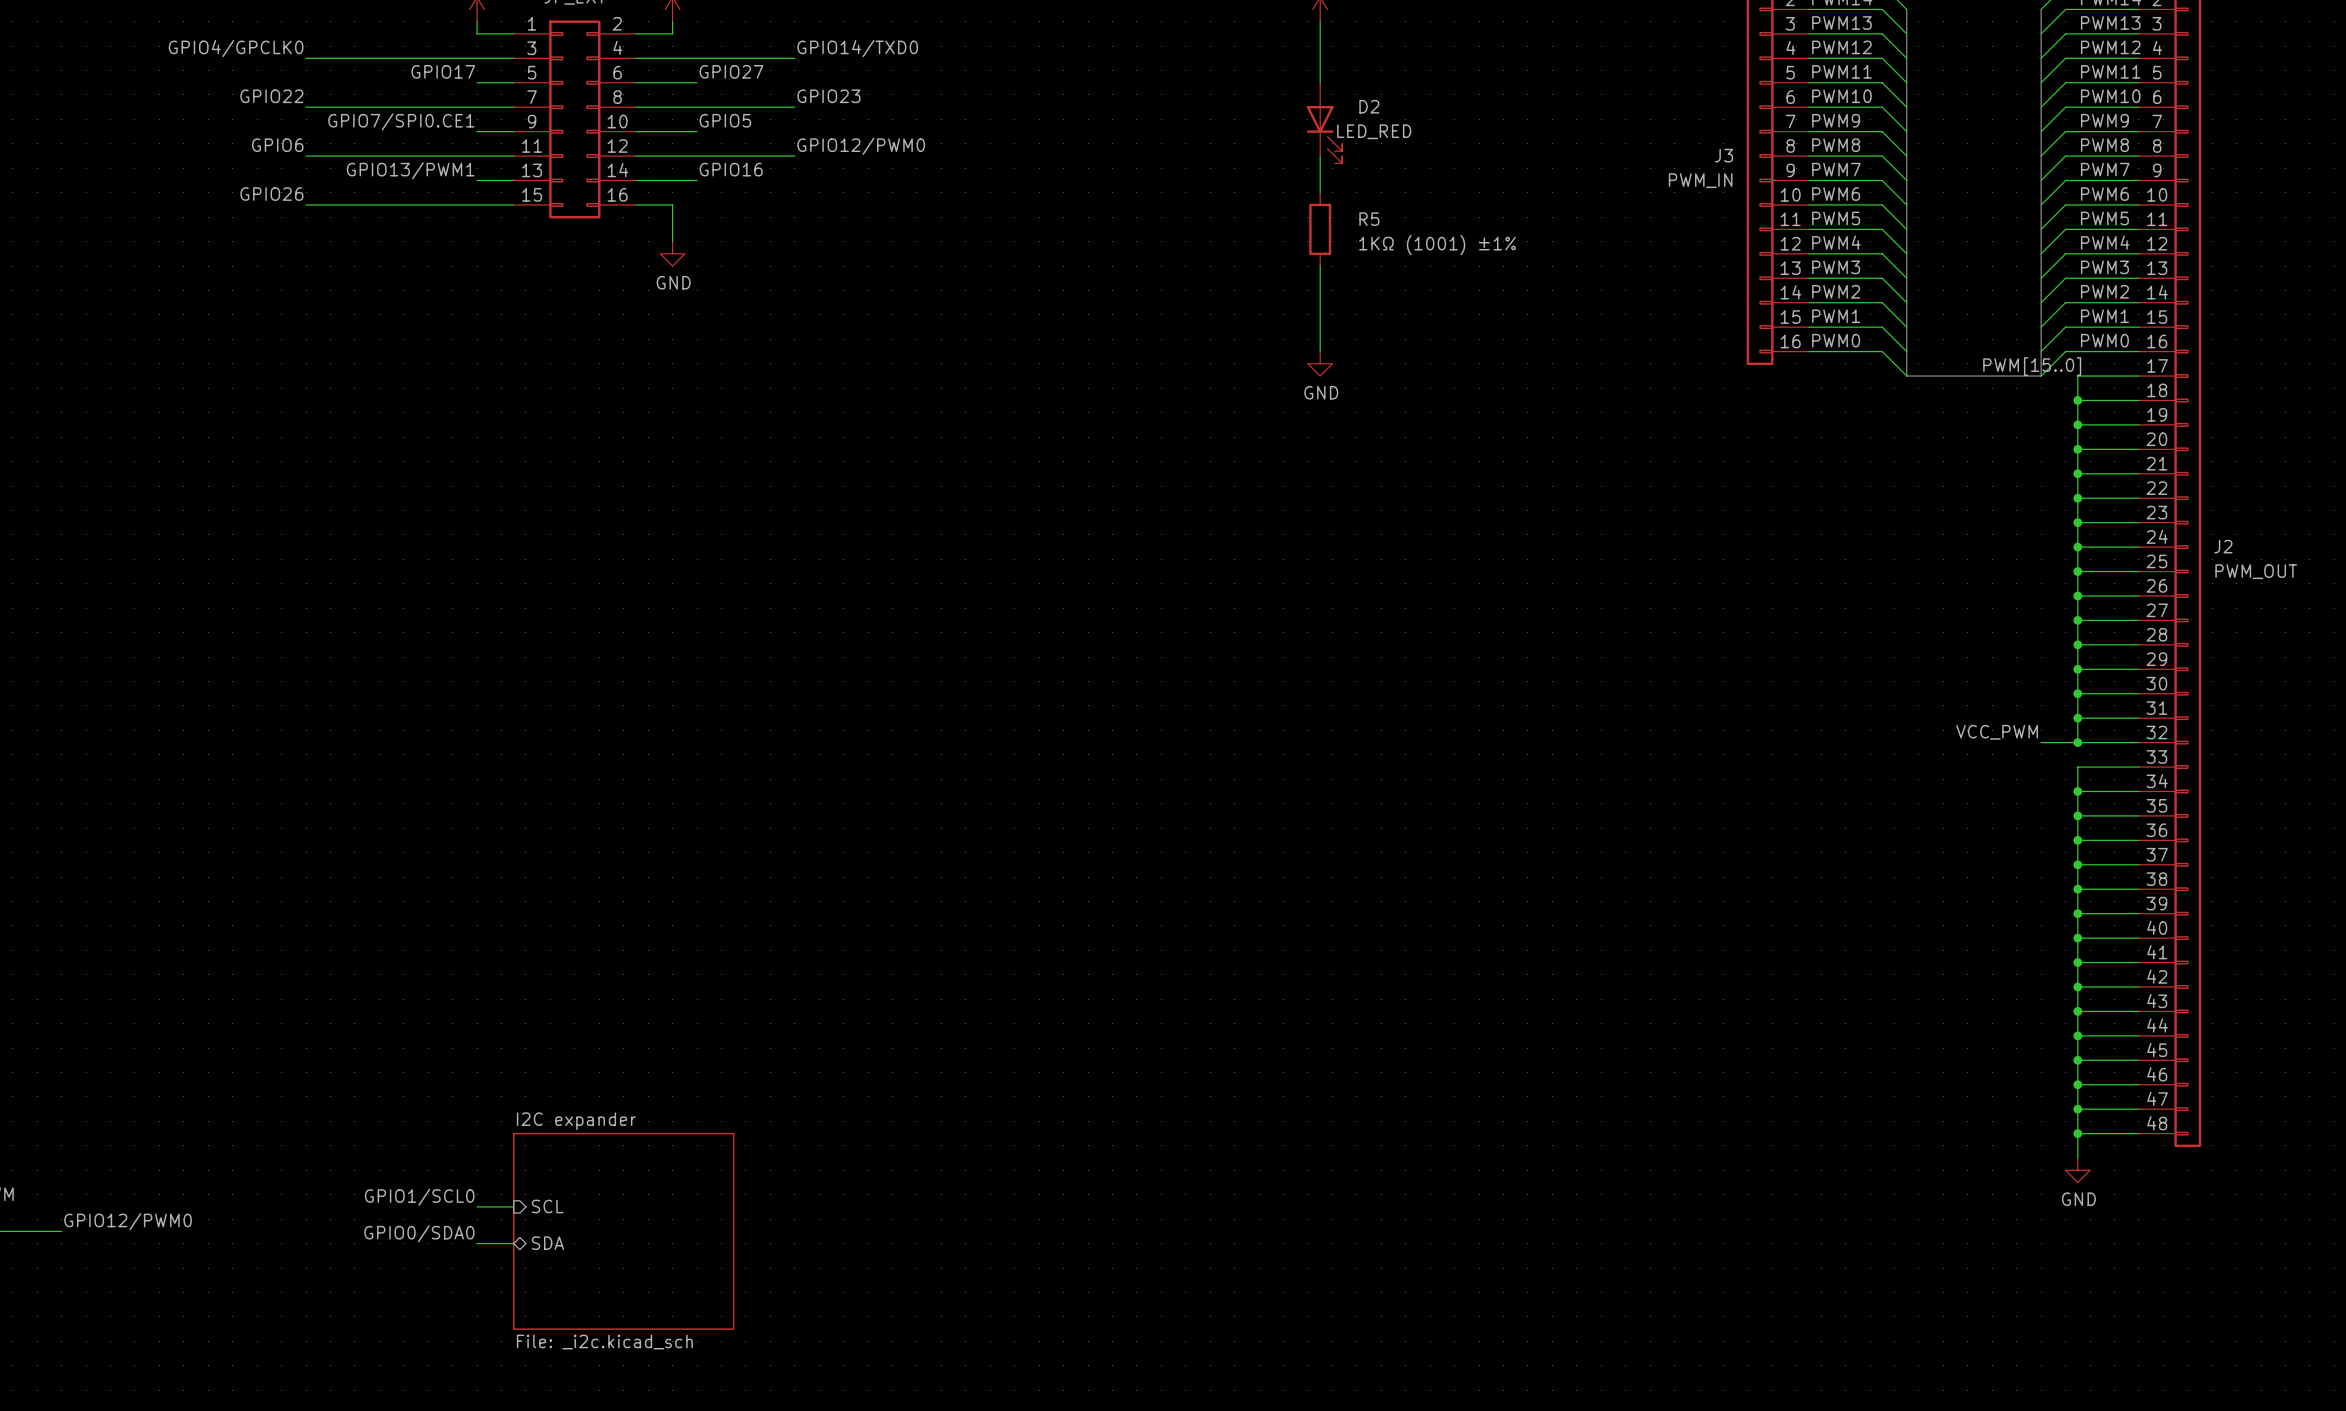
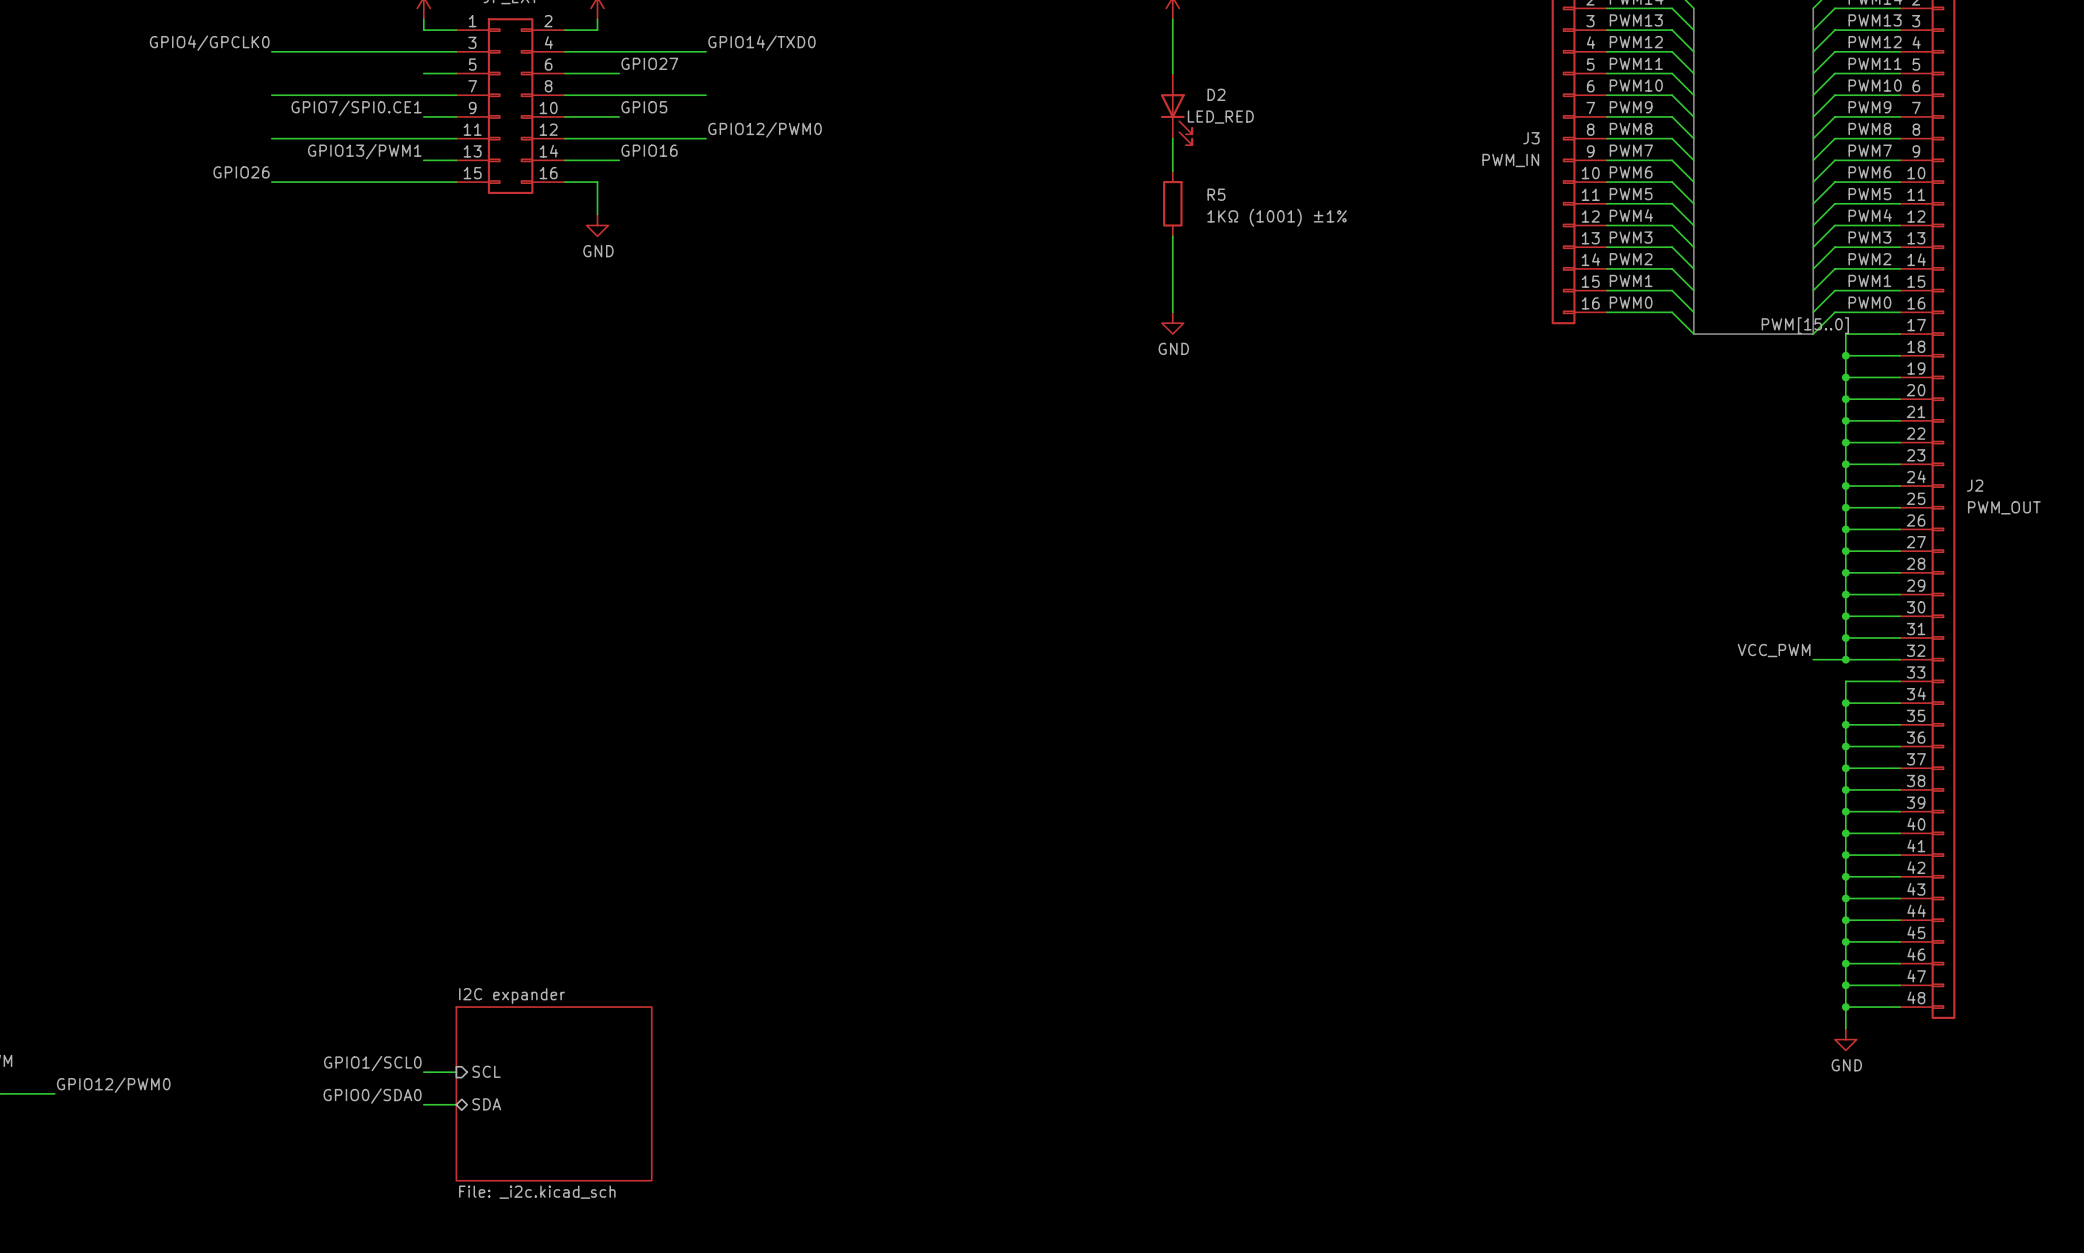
label: GPIO17 (443, 71) -> none
label: GPIO22 (271, 96) -> none
label: GPIO23 (828, 96) -> none
label: GPIO6 (277, 145) -> none

